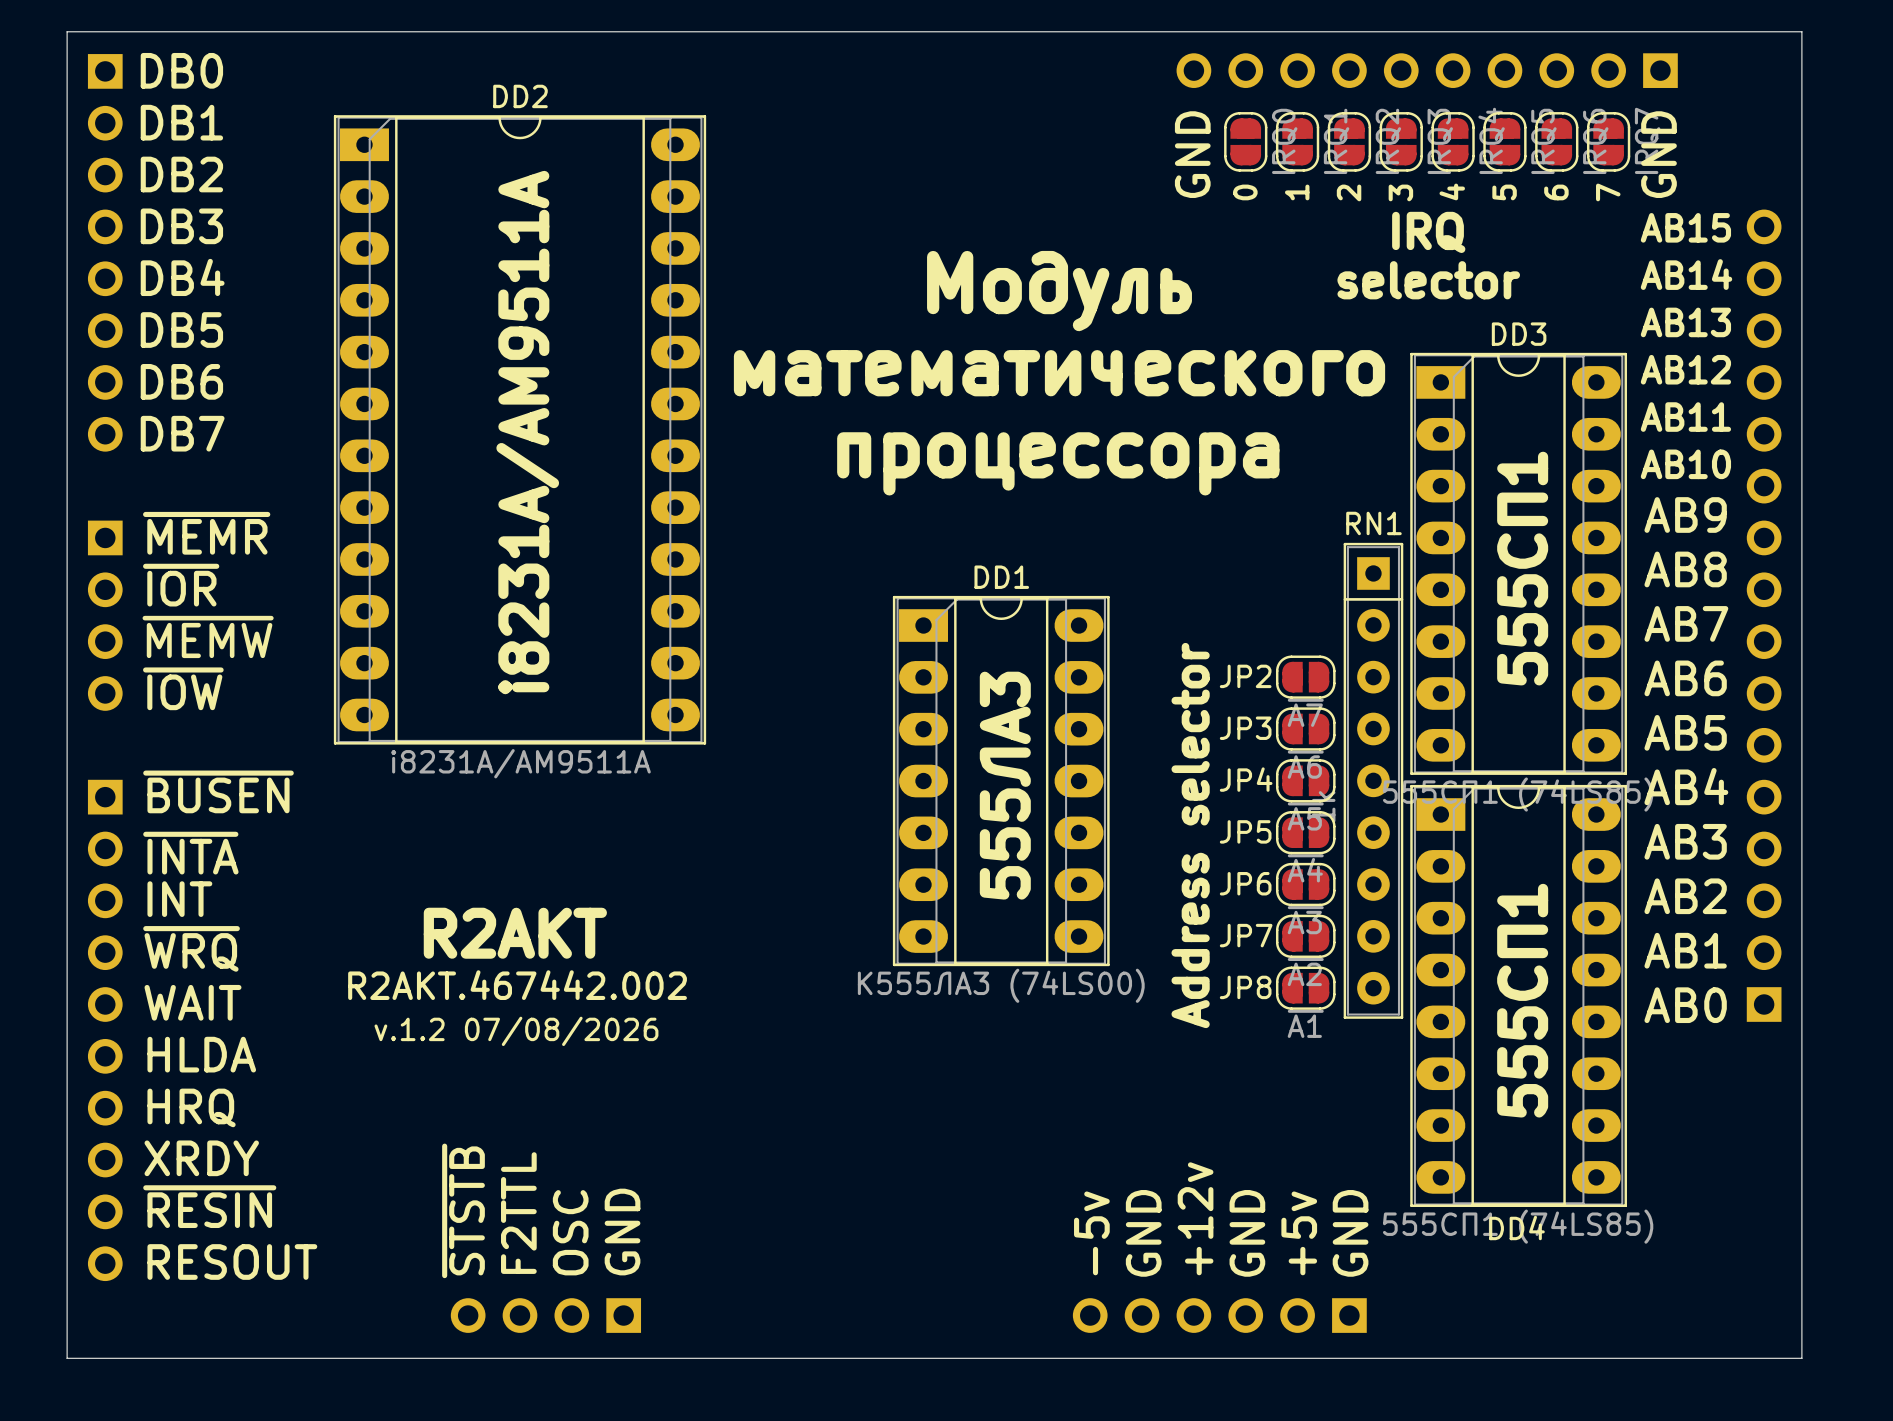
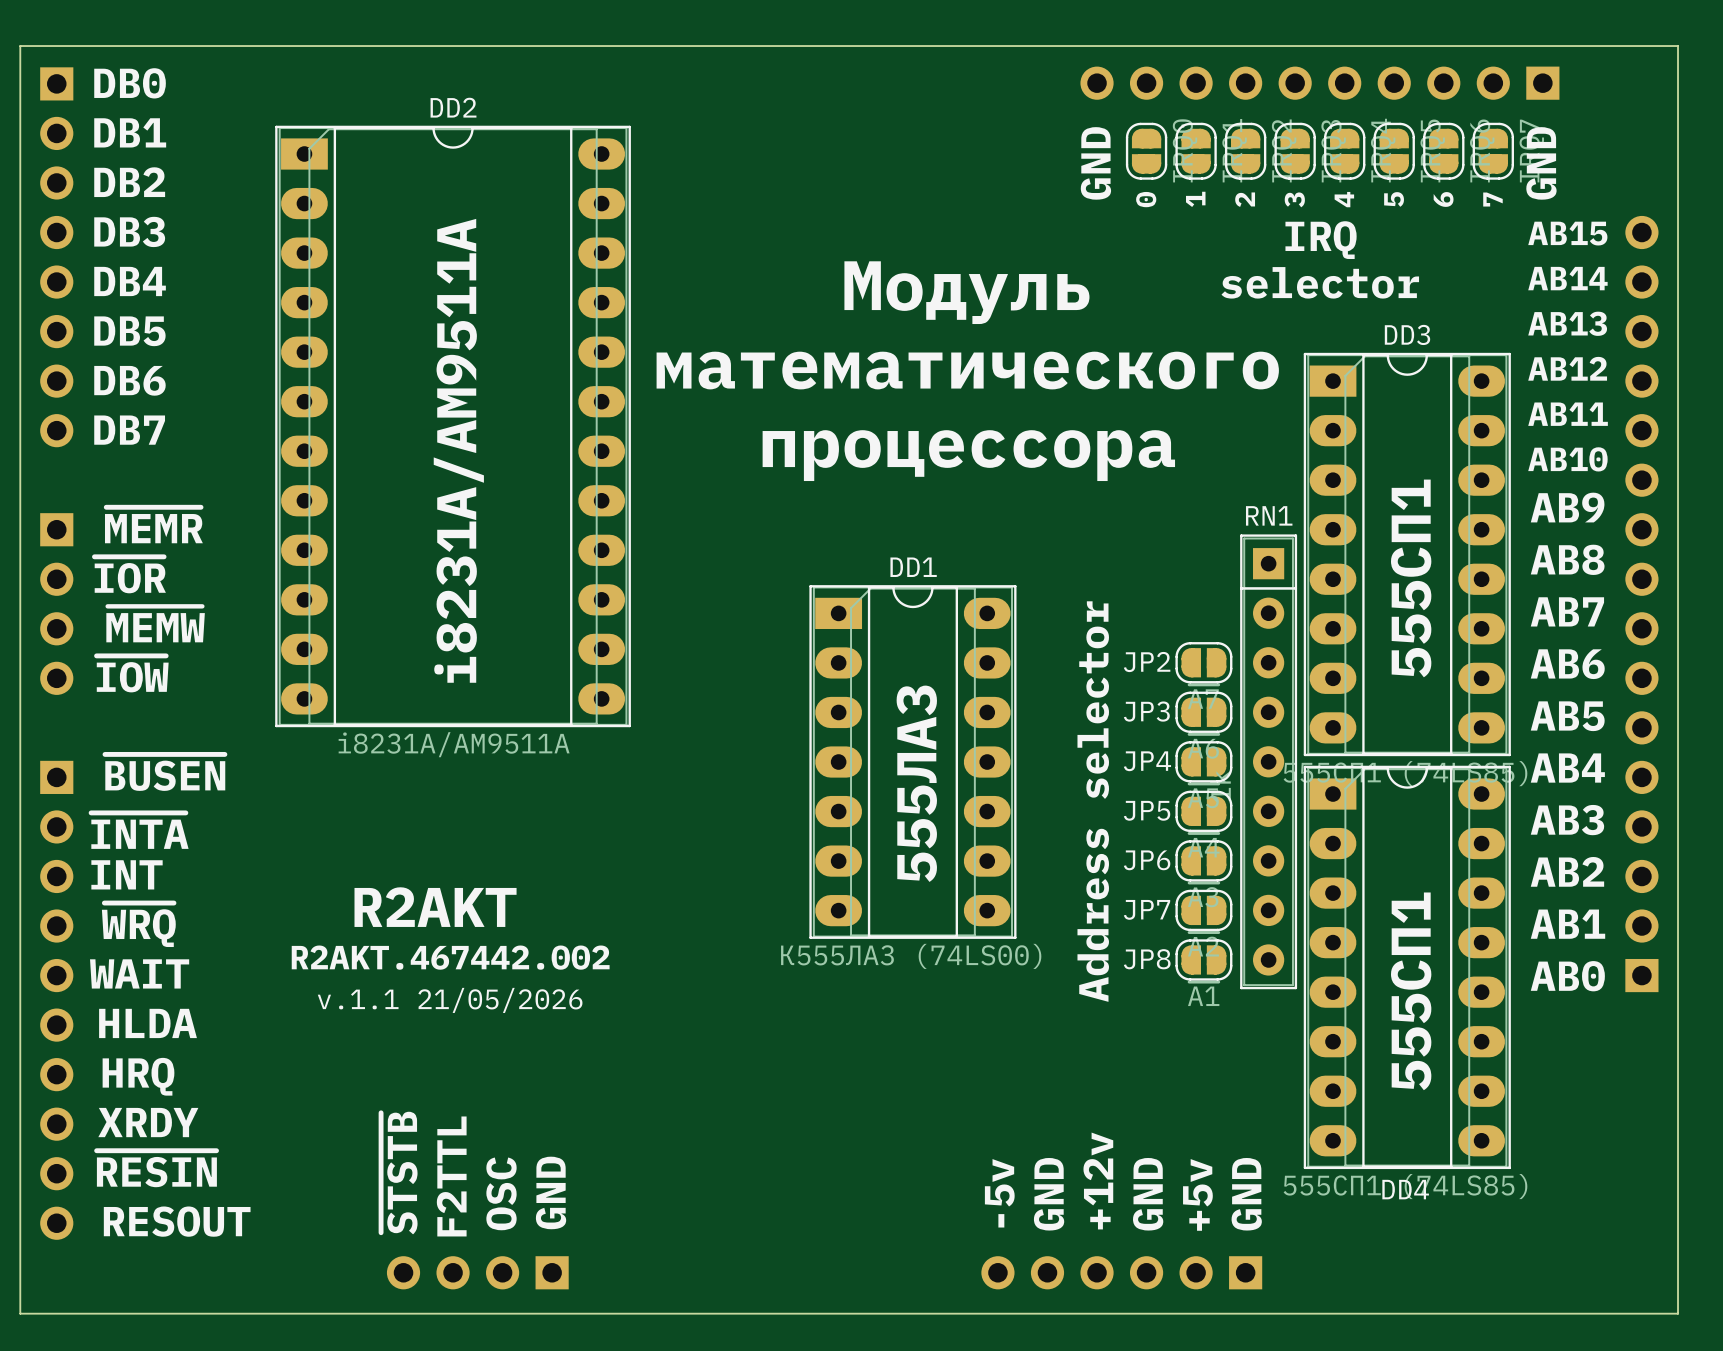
text: v.1.2 07/08/2026 (516, 1031) -> v.1.1 21/05/2026 (450, 1000)

